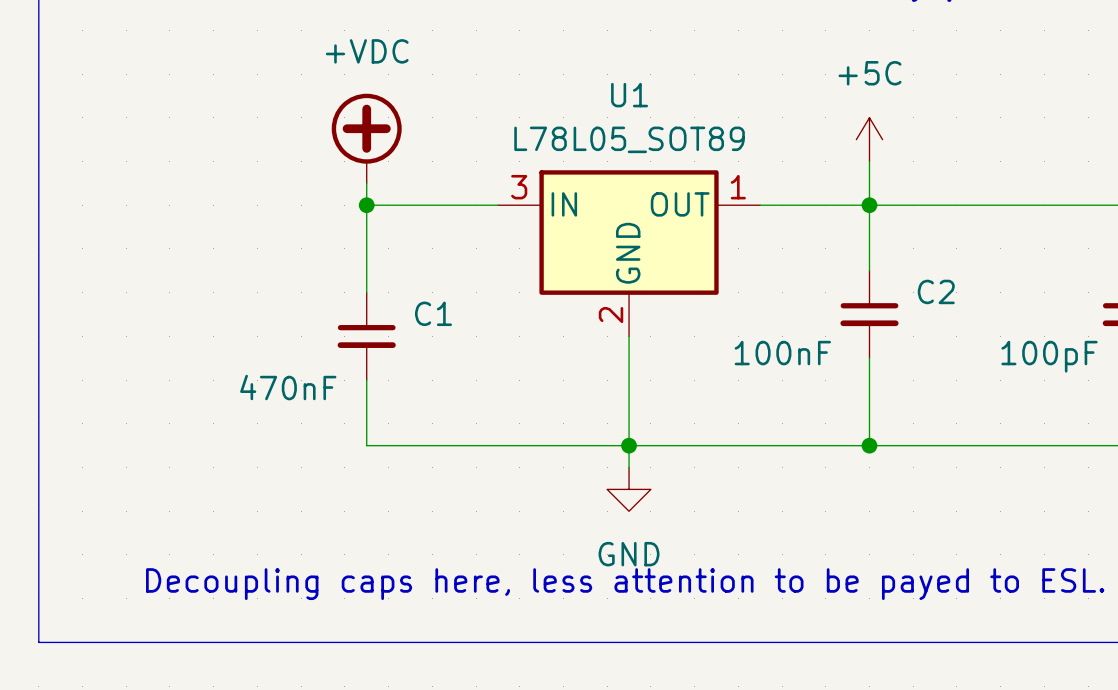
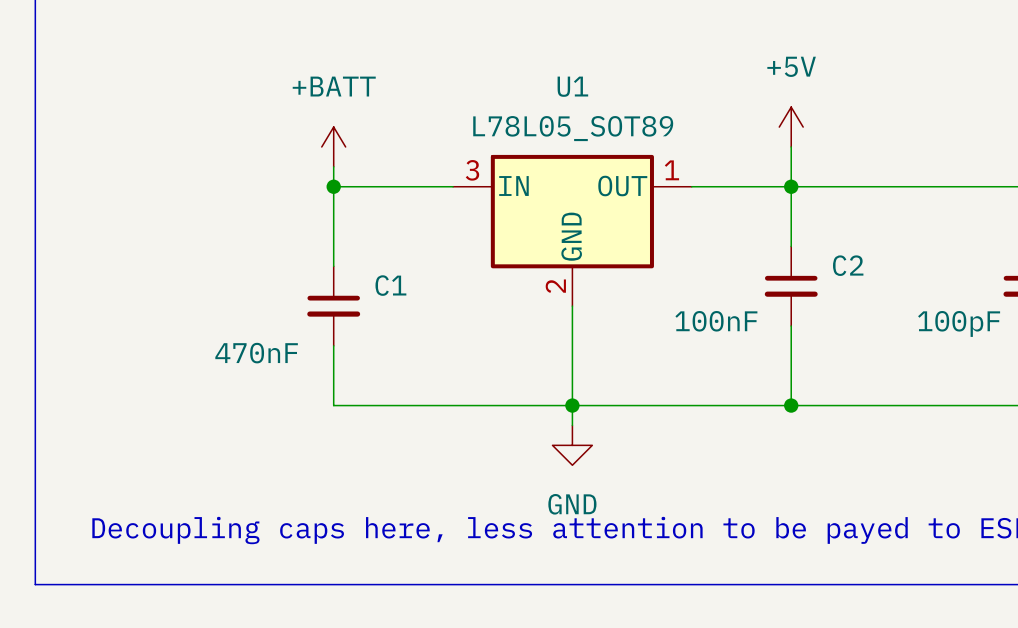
power symbol: +VDC (366, 138) -> none
power symbol: +5C (869, 139) -> +5V (791, 127)
power symbol: none -> +BATT (333, 146)

